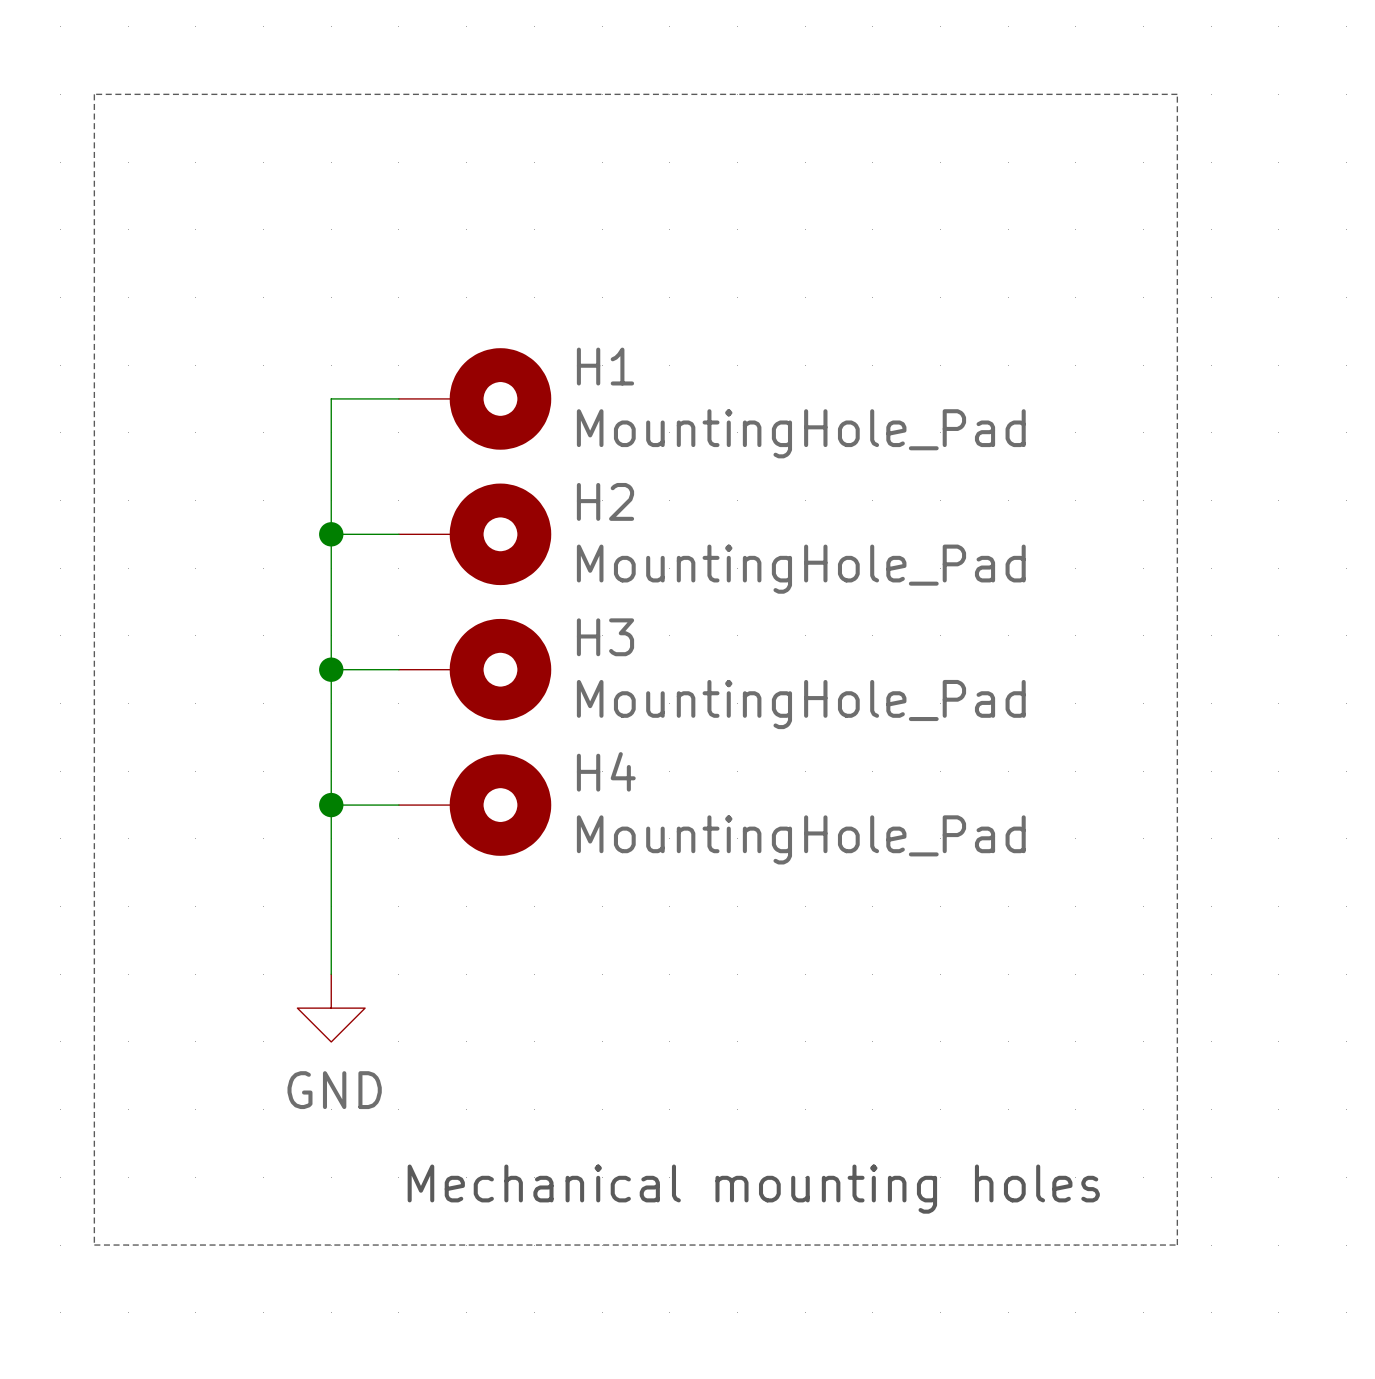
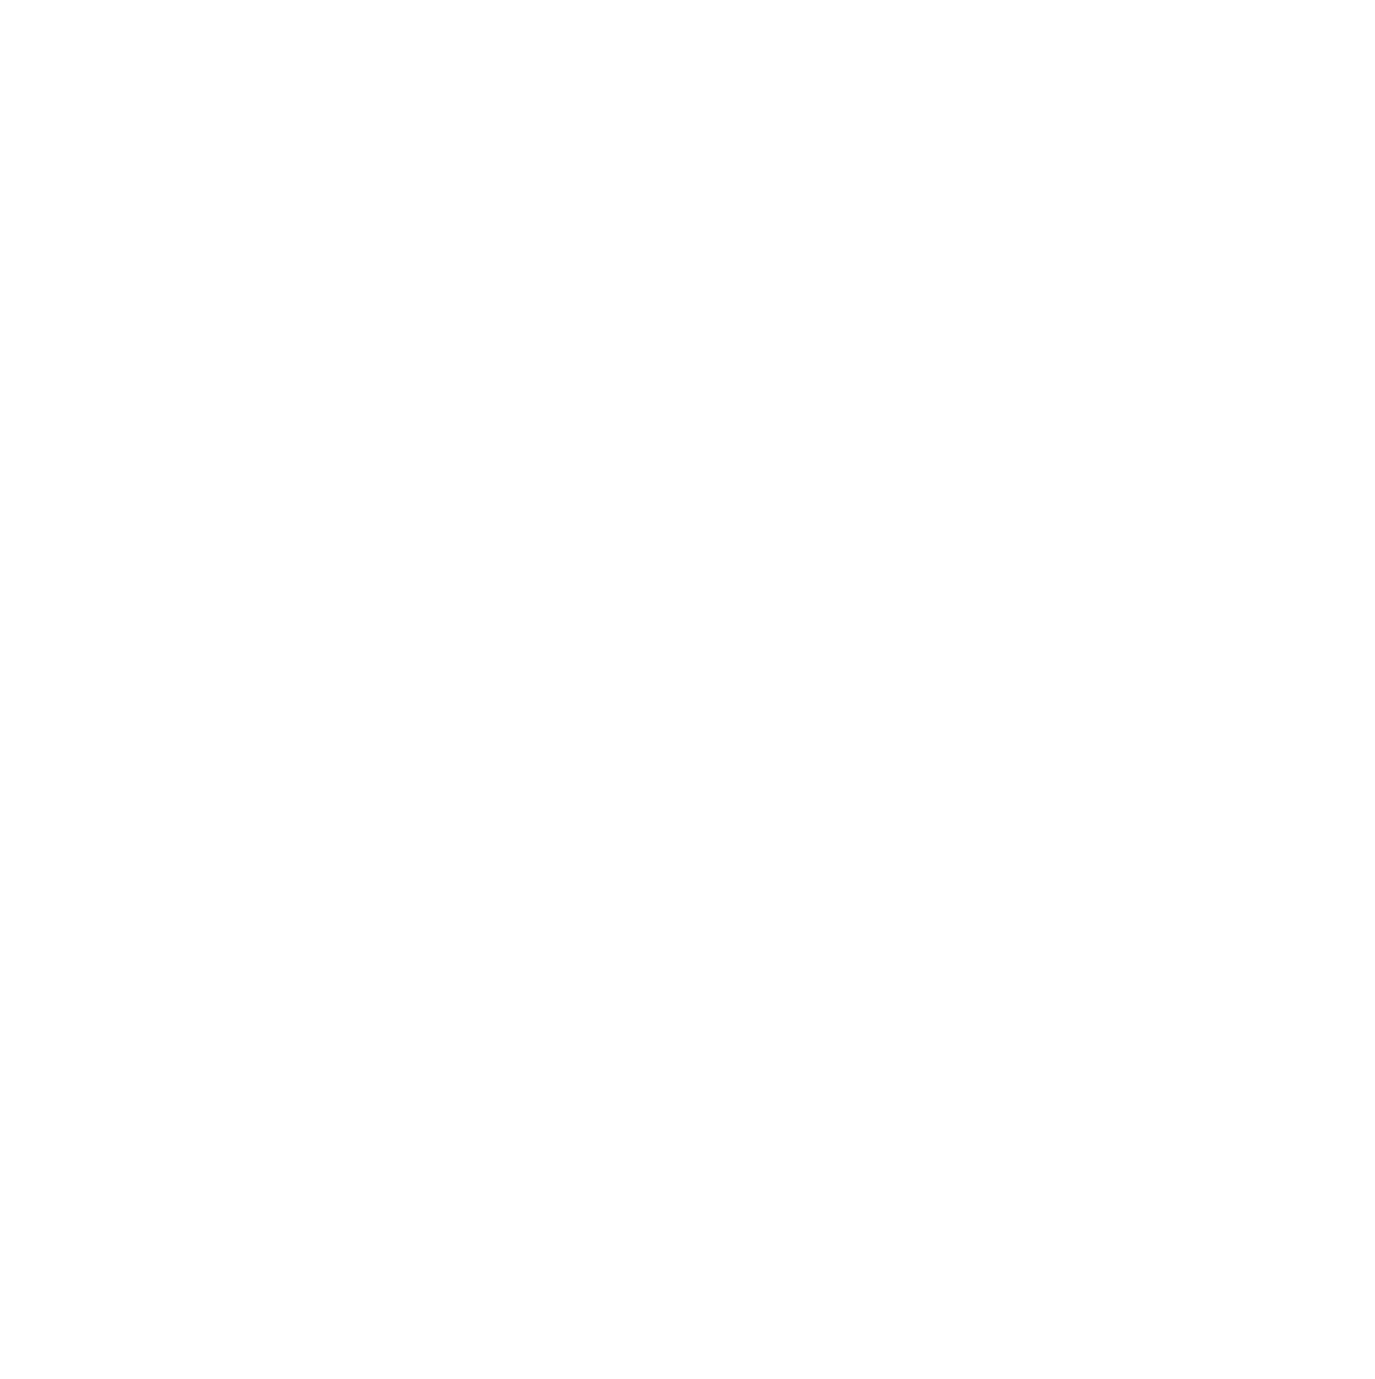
line: (94, 94) (94, 1245) (1177, 1245) (1177, 94) (94, 94) -> none
wire: (398, 398) (331, 398) (331, 974) -> none
H1: MountingHole_Pad (475, 398) -> none
wire: (331, 534) (398, 534) -> none
junction: (331, 534) -> none
H2: MountingHole_Pad (475, 534) -> none
wire: (331, 669) (398, 669) -> none
junction: (331, 669) -> none
H3: MountingHole_Pad (475, 669) -> none
wire: (331, 805) (398, 805) -> none
junction: (331, 805) -> none
H4: MountingHole_Pad (475, 805) -> none
power symbol: GND (331, 1008) -> none
text: Mechanical mounting holes (753, 1189) -> none

